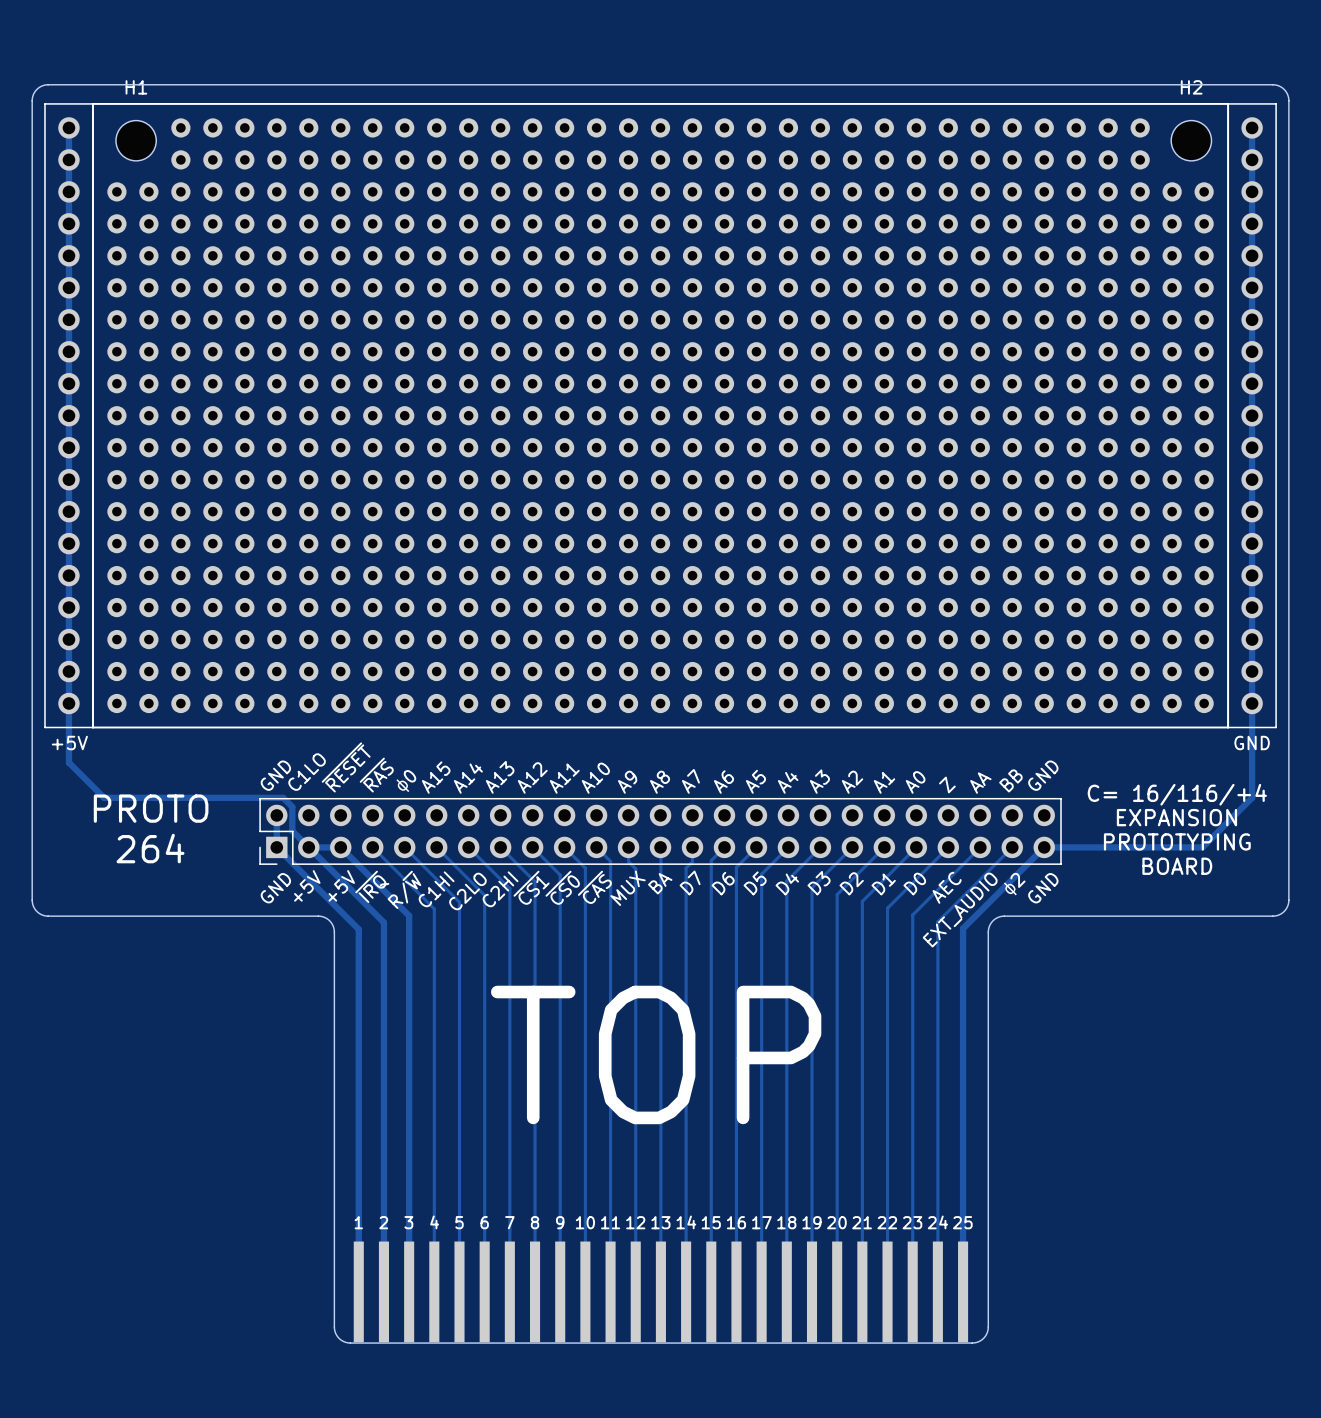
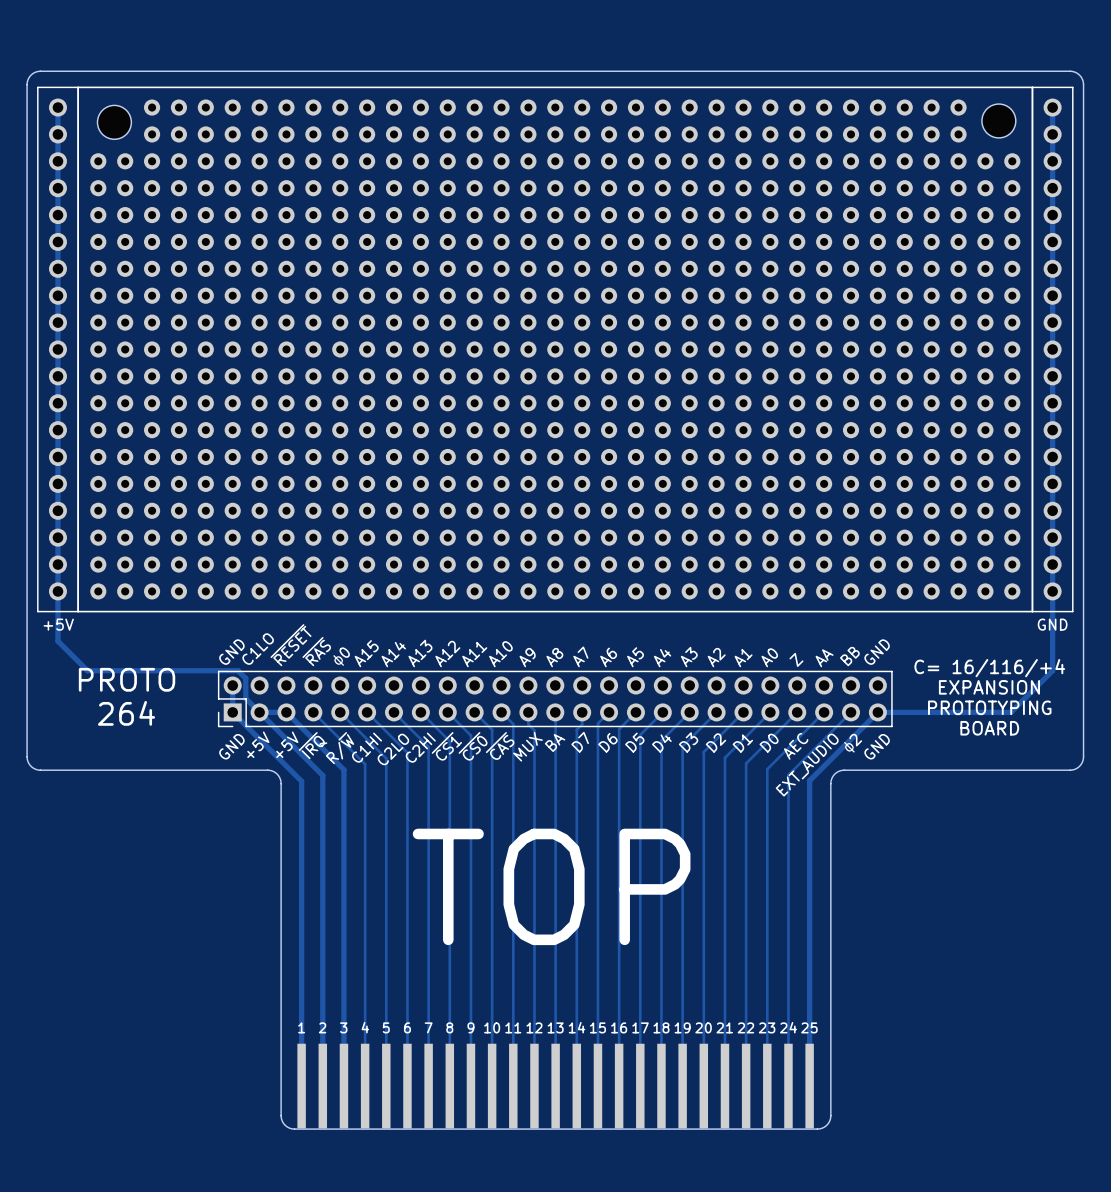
part footprint: [92, 103, 1230, 729] -> [77, 86, 1034, 613]
H1: (136, 140) -> none
H2: (1191, 140) -> none

